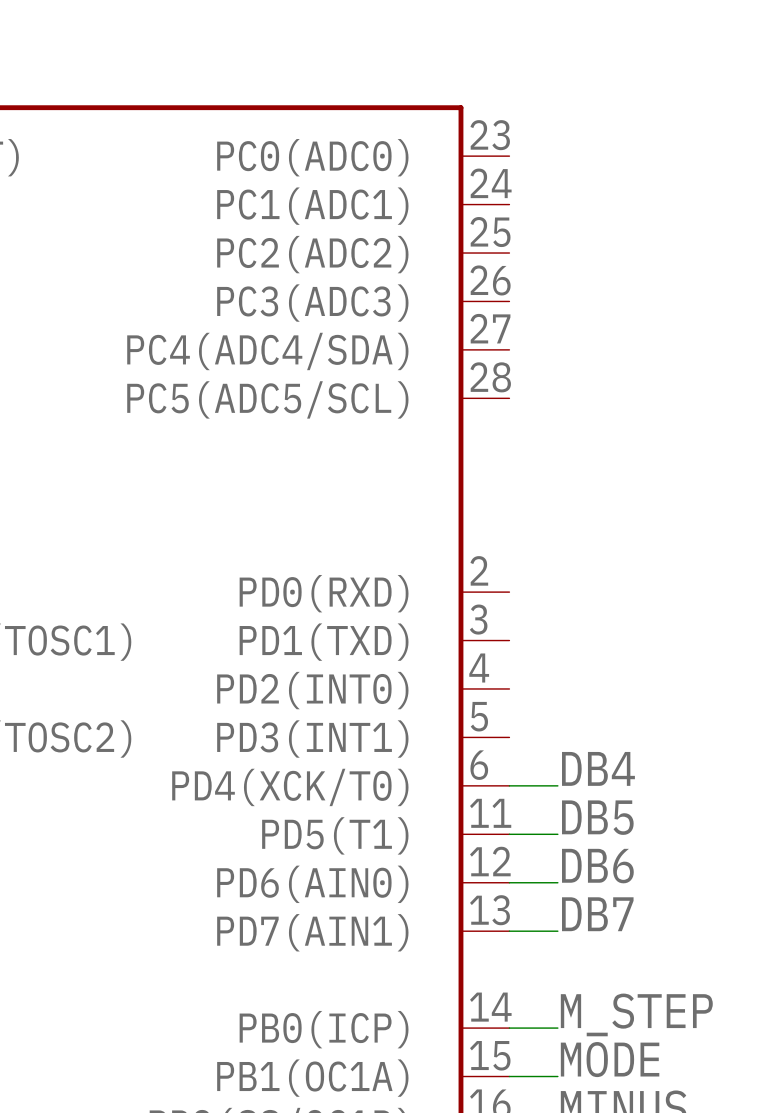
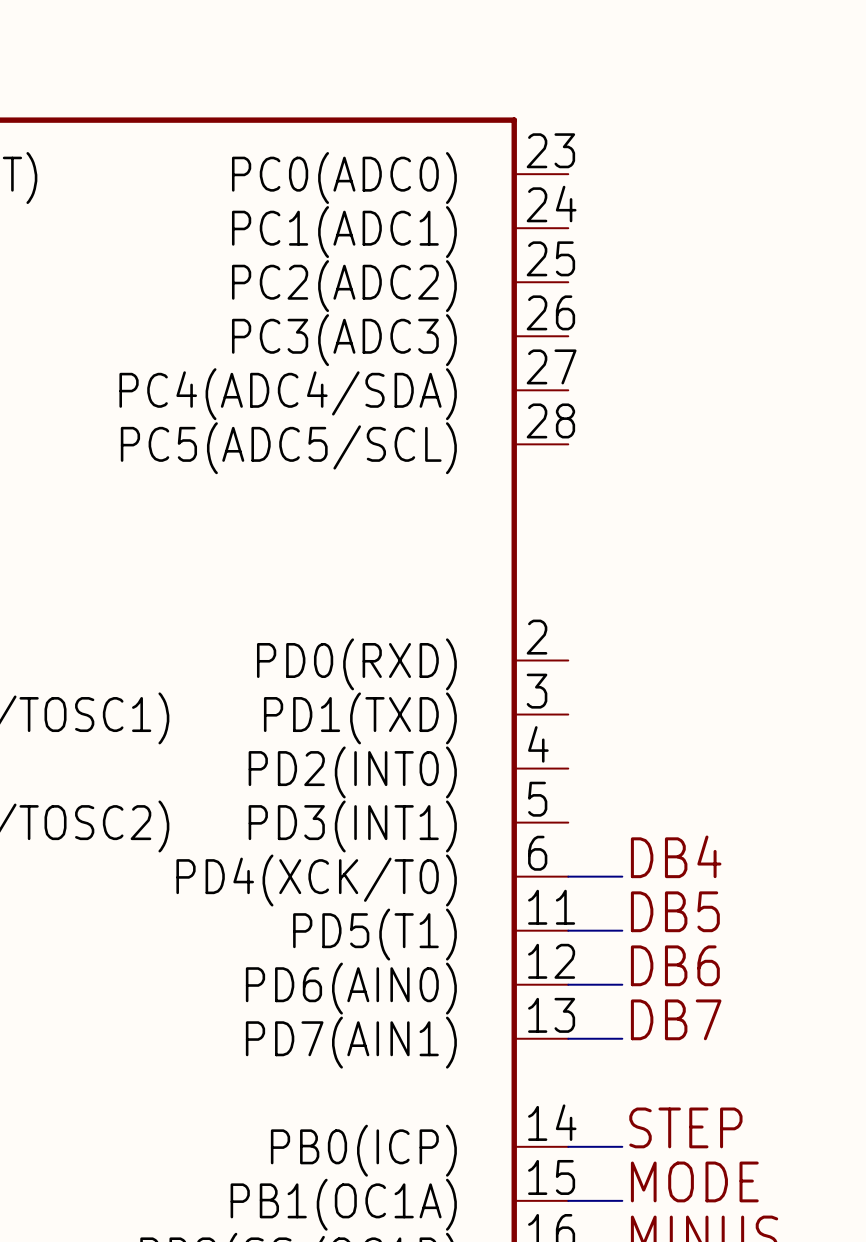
label: M_STEP (636, 1014) -> STEP (685, 1127)

